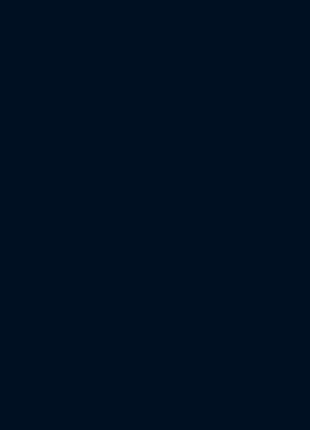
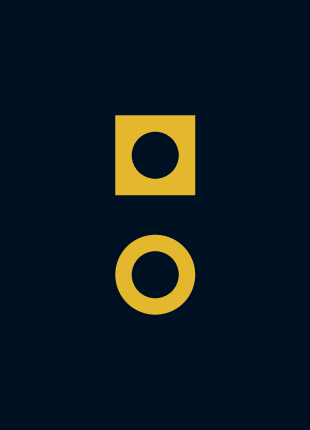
part: none -> (155, 214)

